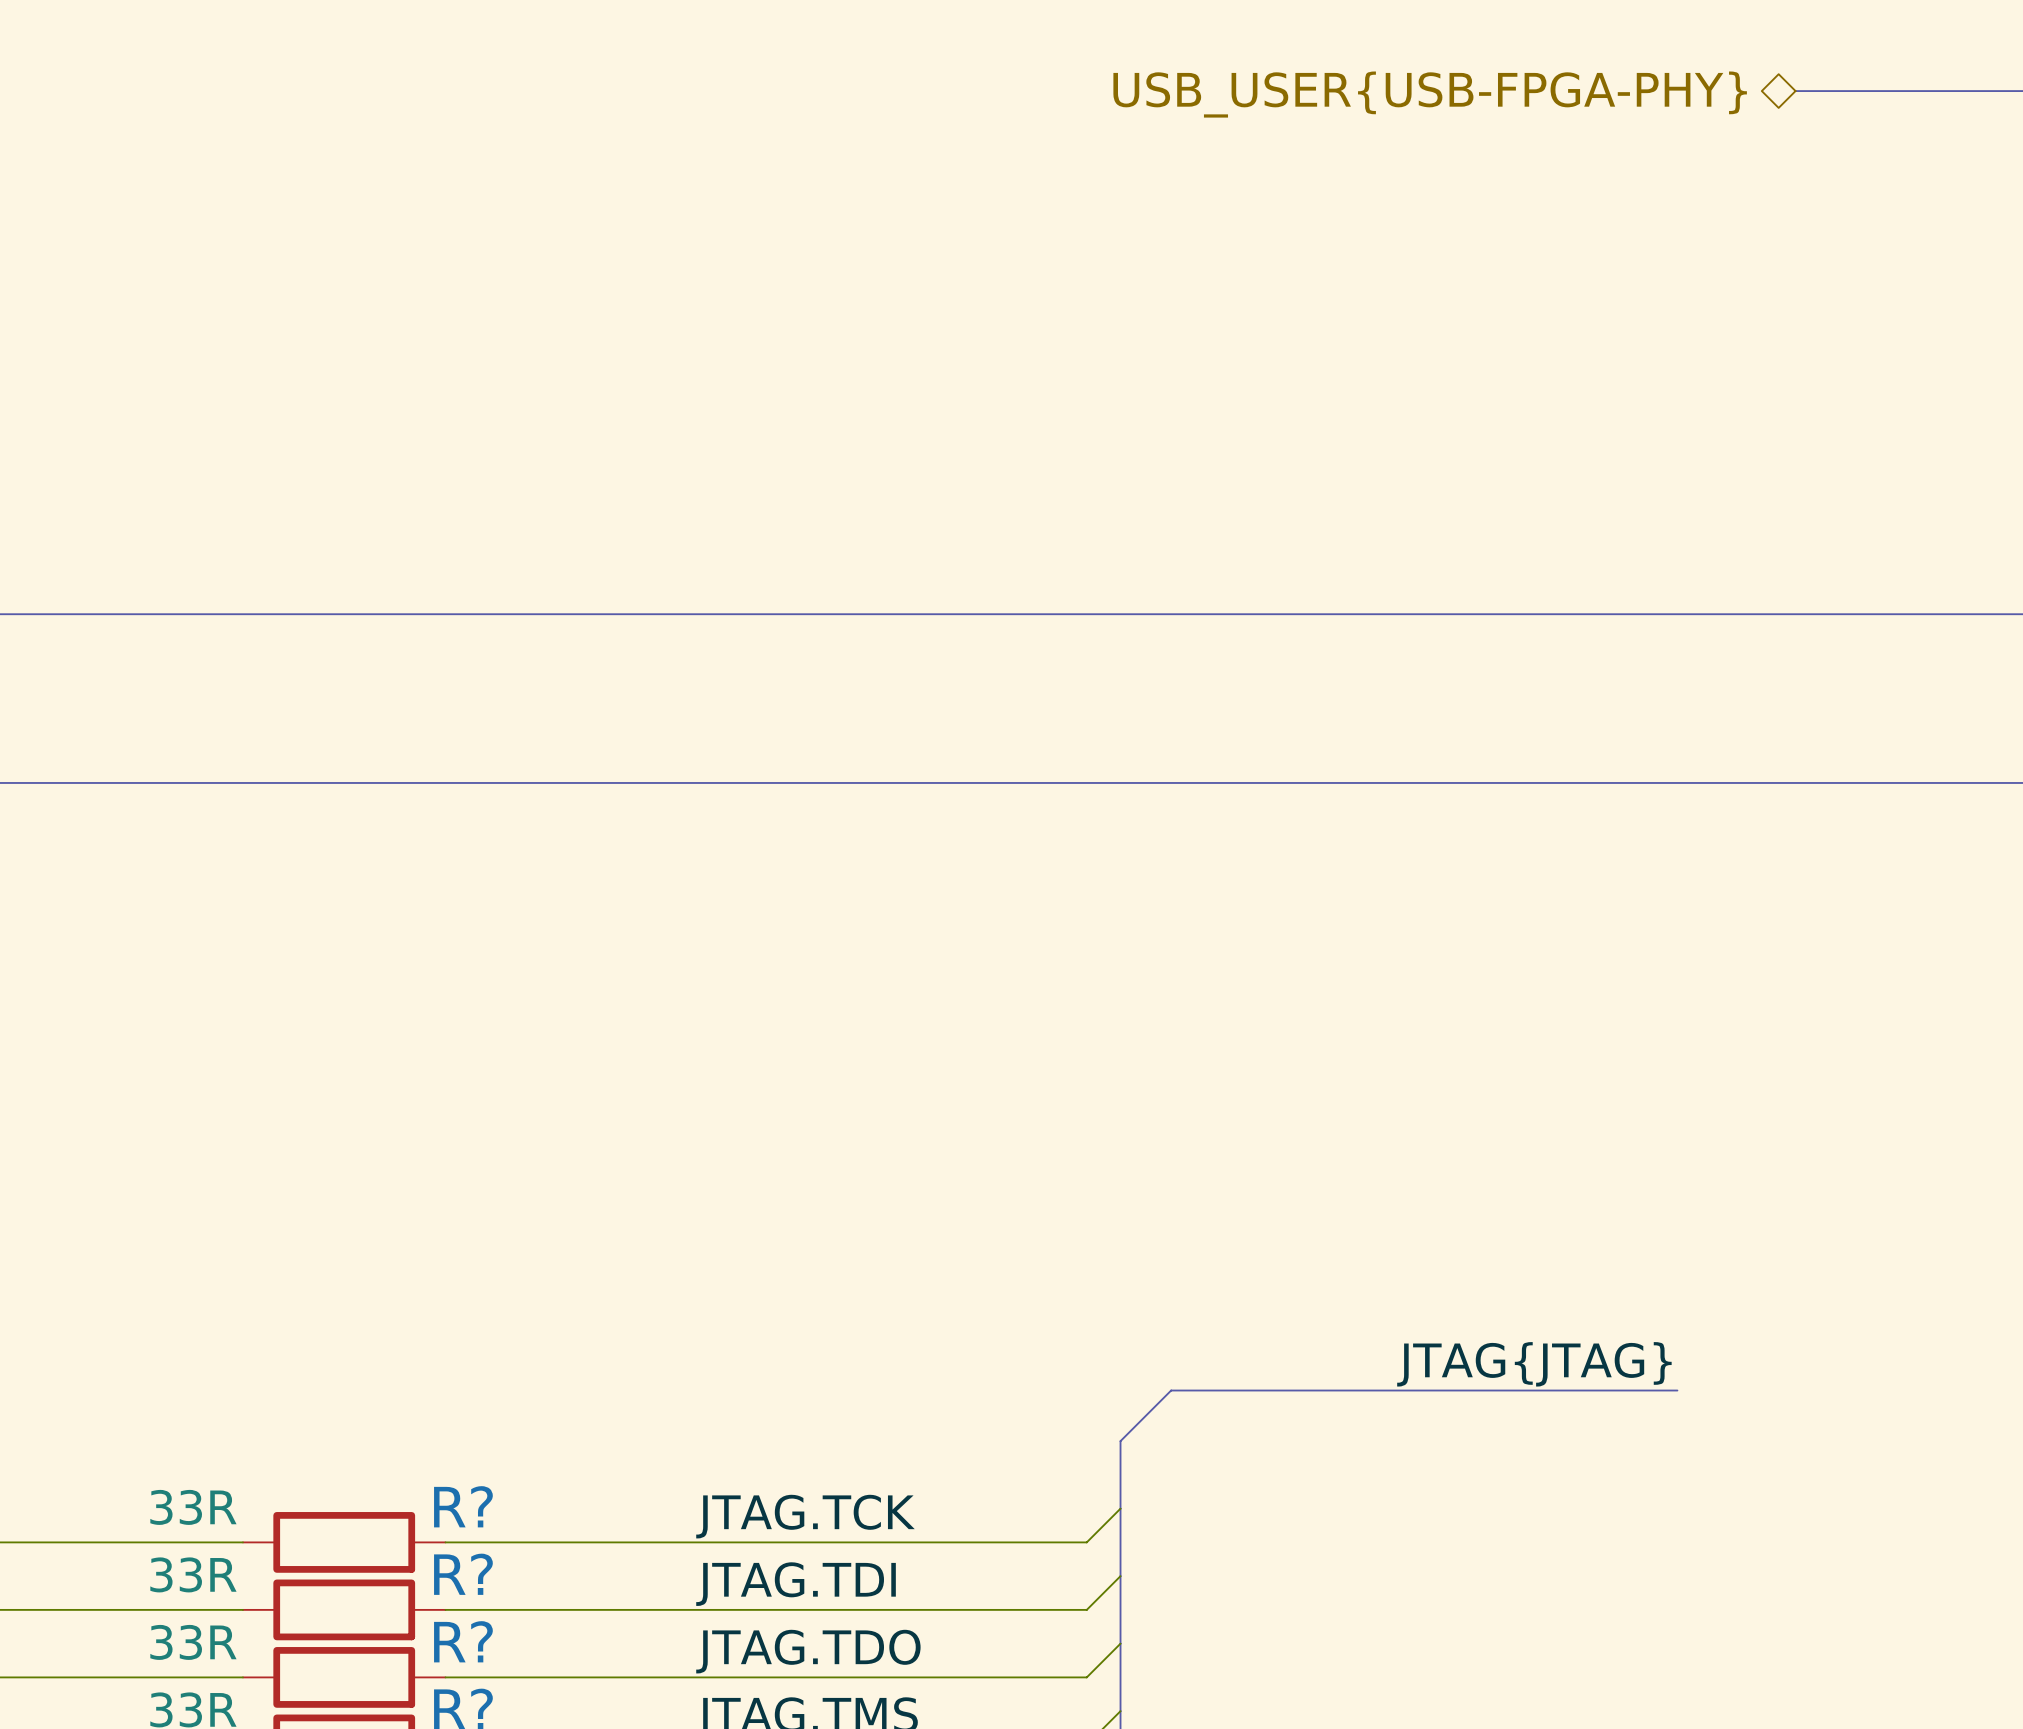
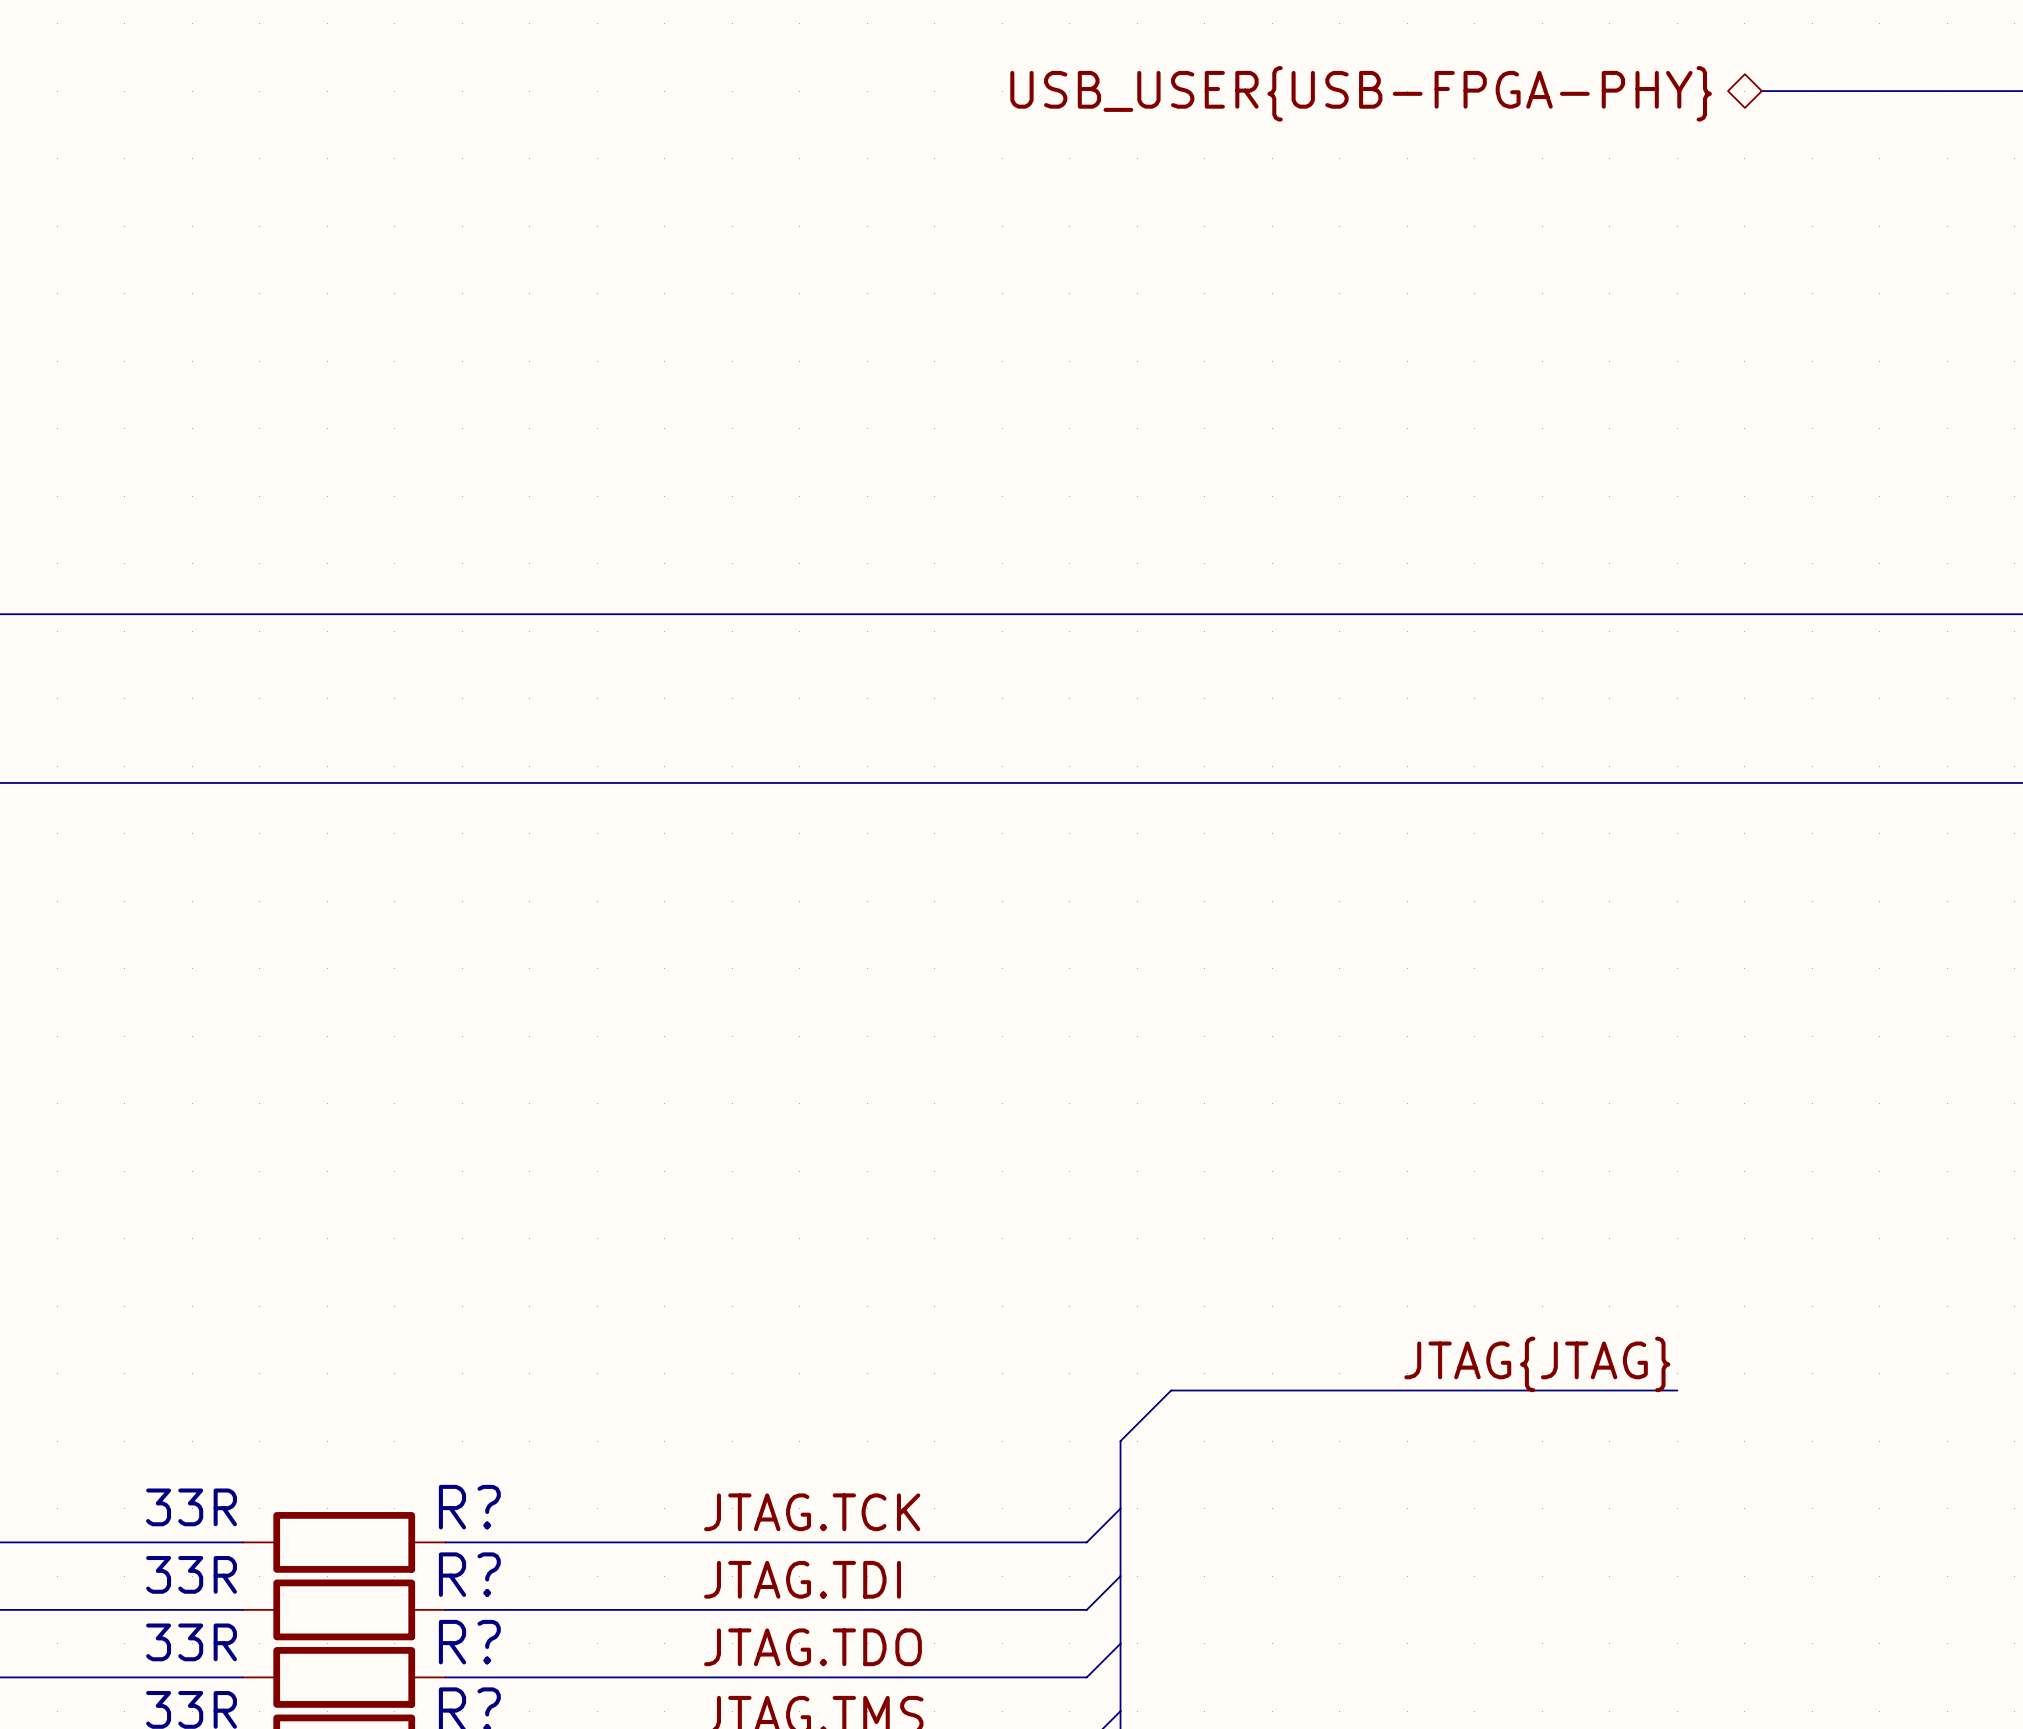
bus: none -> (1761, 91) (1795, 91)
hierarchical label position: USB_USER{USB-FPGA-PHY} (1430, 94) -> USB_USER{USB-FPGA-PHY} (1361, 93)

